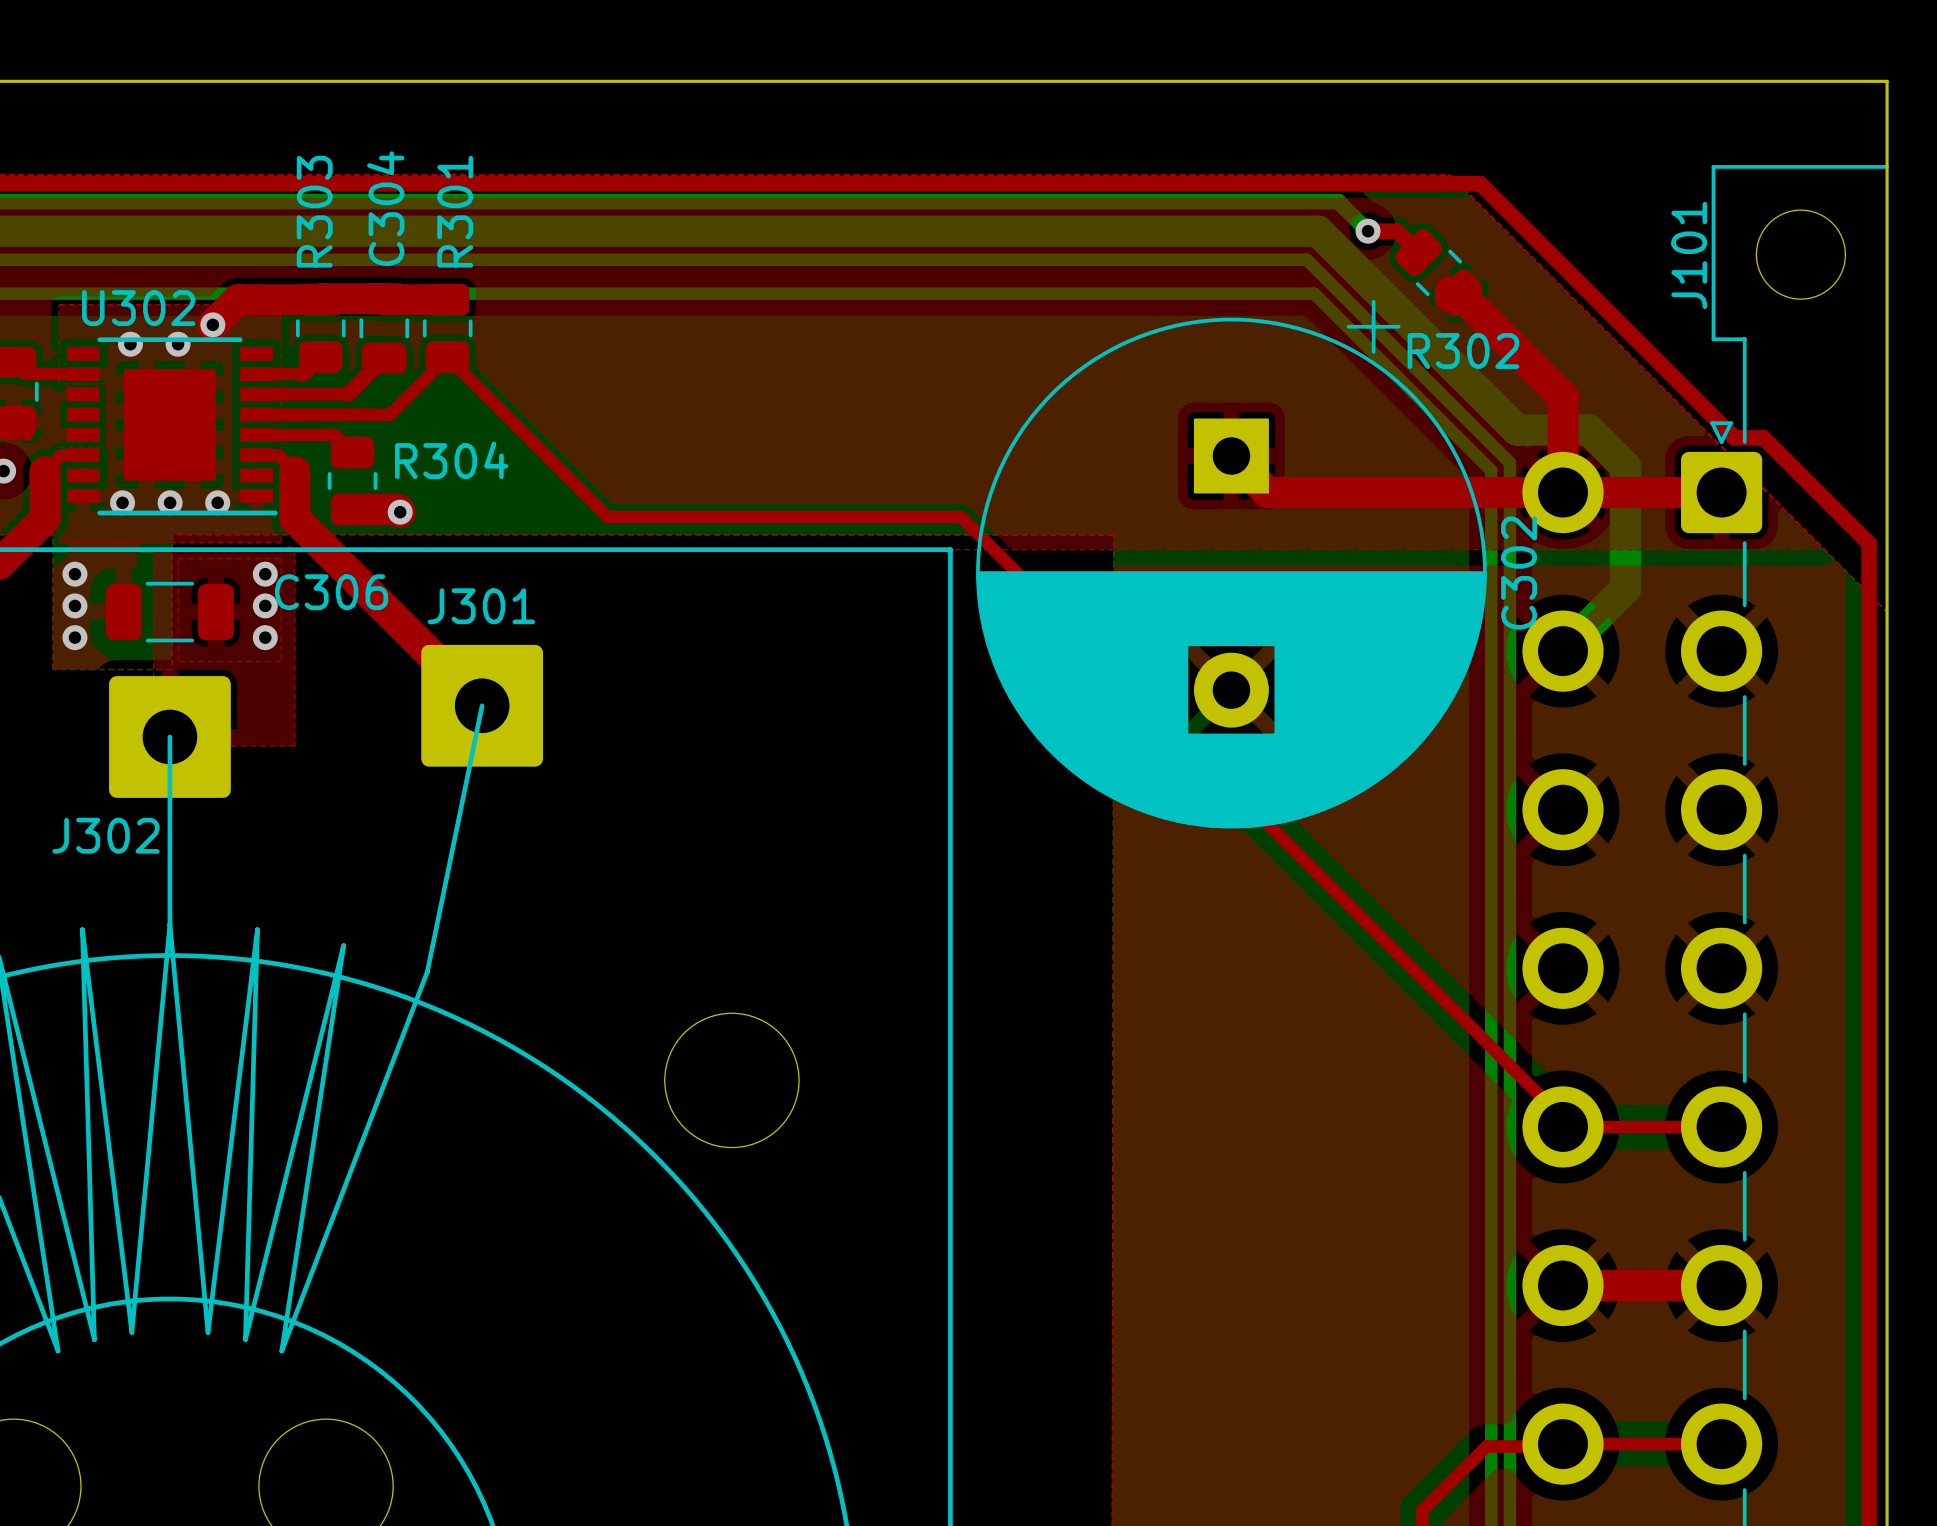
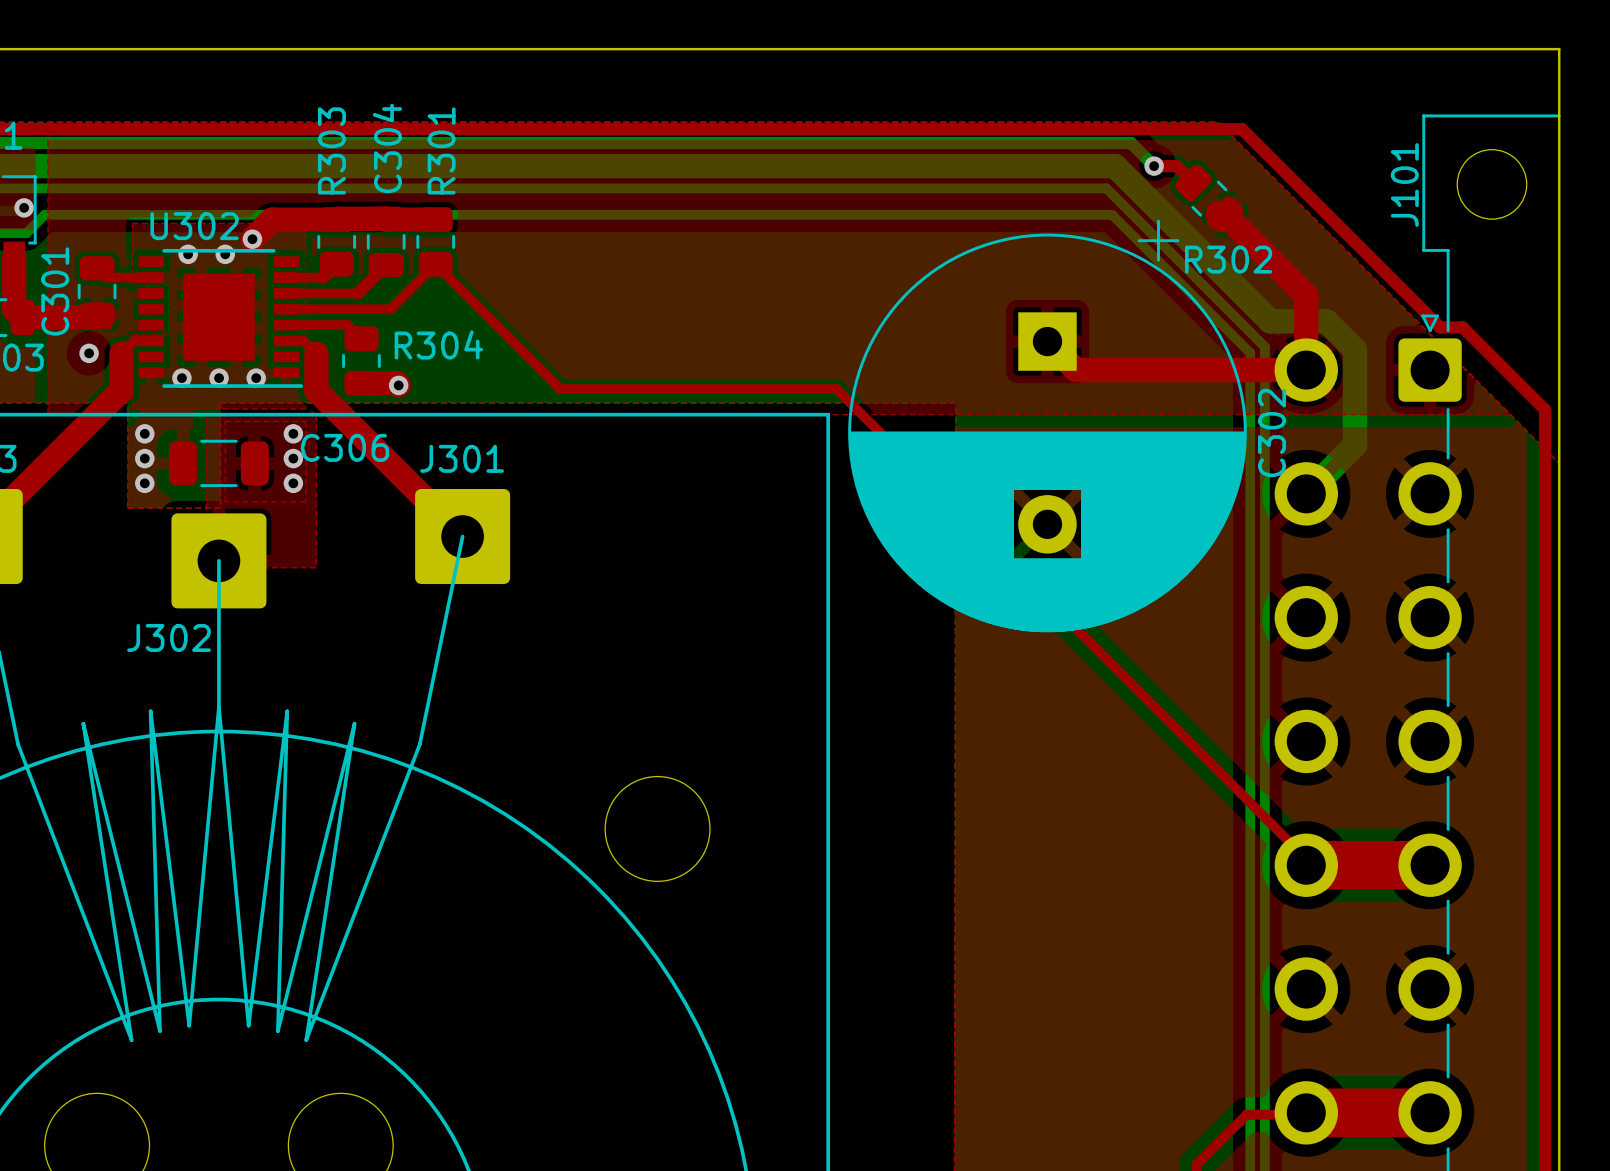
top track: (1563, 492) (1721, 492) -> none
top track width: thin (1563, 1126) (1721, 1126) -> thick (1306, 865) (1430, 865)
top track: (1563, 1285) (1721, 1285) -> none
top track width: thin (1563, 1444) (1721, 1444) -> thick (1306, 1112) (1430, 1112)

